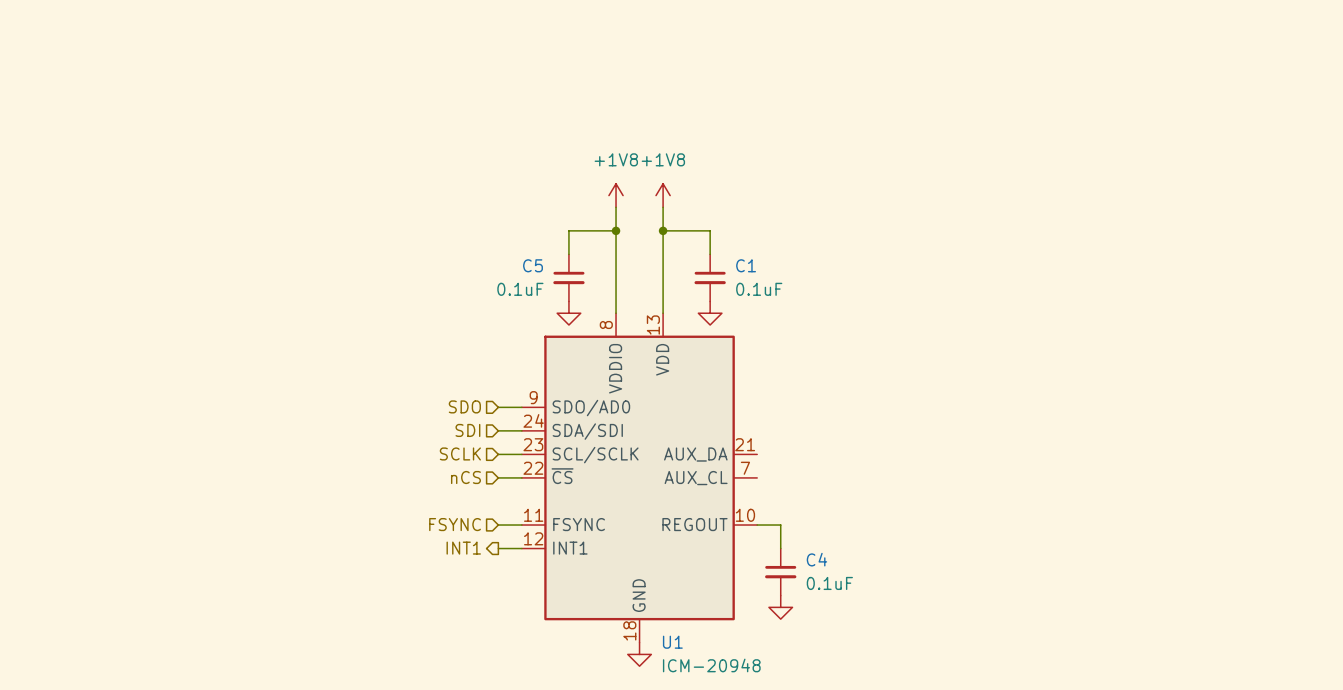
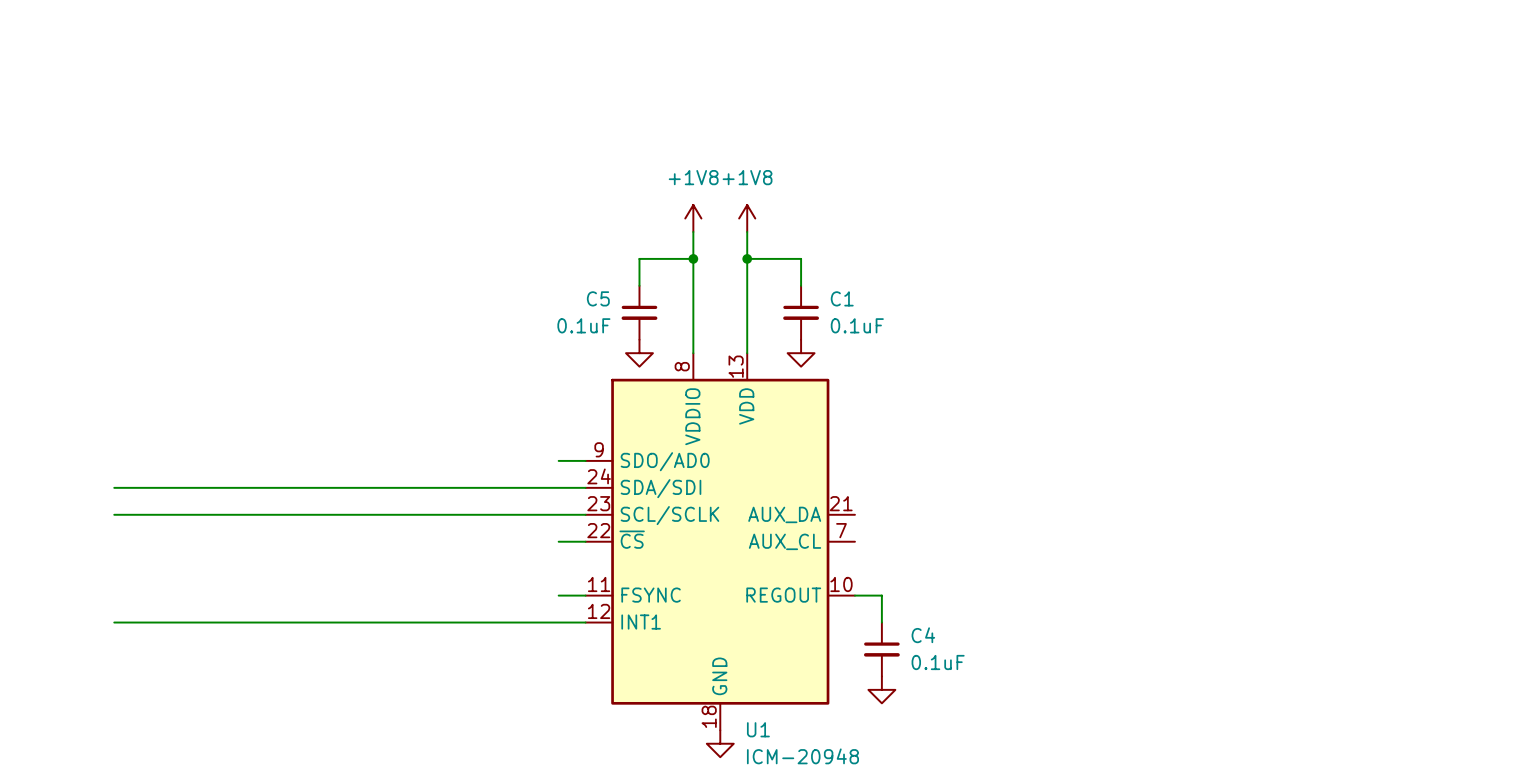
hierarchical label: SDO (464, 406) -> none
wire: none -> (114, 487) (558, 487)
hierarchical label: SDI (467, 430) -> none
hierarchical label: SCLK (460, 453) -> none
wire: none -> (114, 514) (558, 514)
hierarchical label: nCS (465, 477) -> none
hierarchical label: FSYNC (455, 524) -> none
wire: none -> (114, 622) (558, 622)
hierarchical label: INT1 (463, 548) -> none

